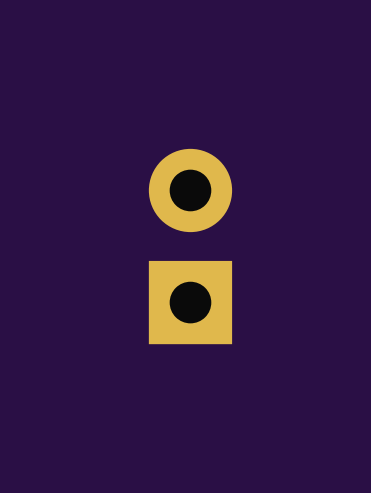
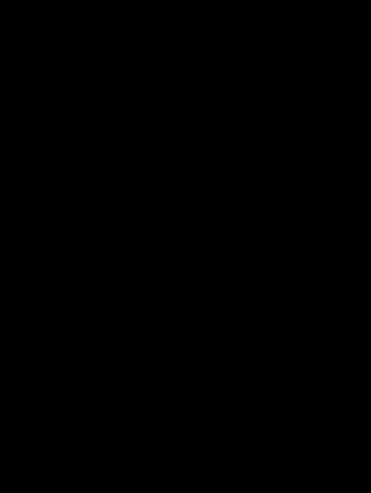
part: (190, 246) -> none

